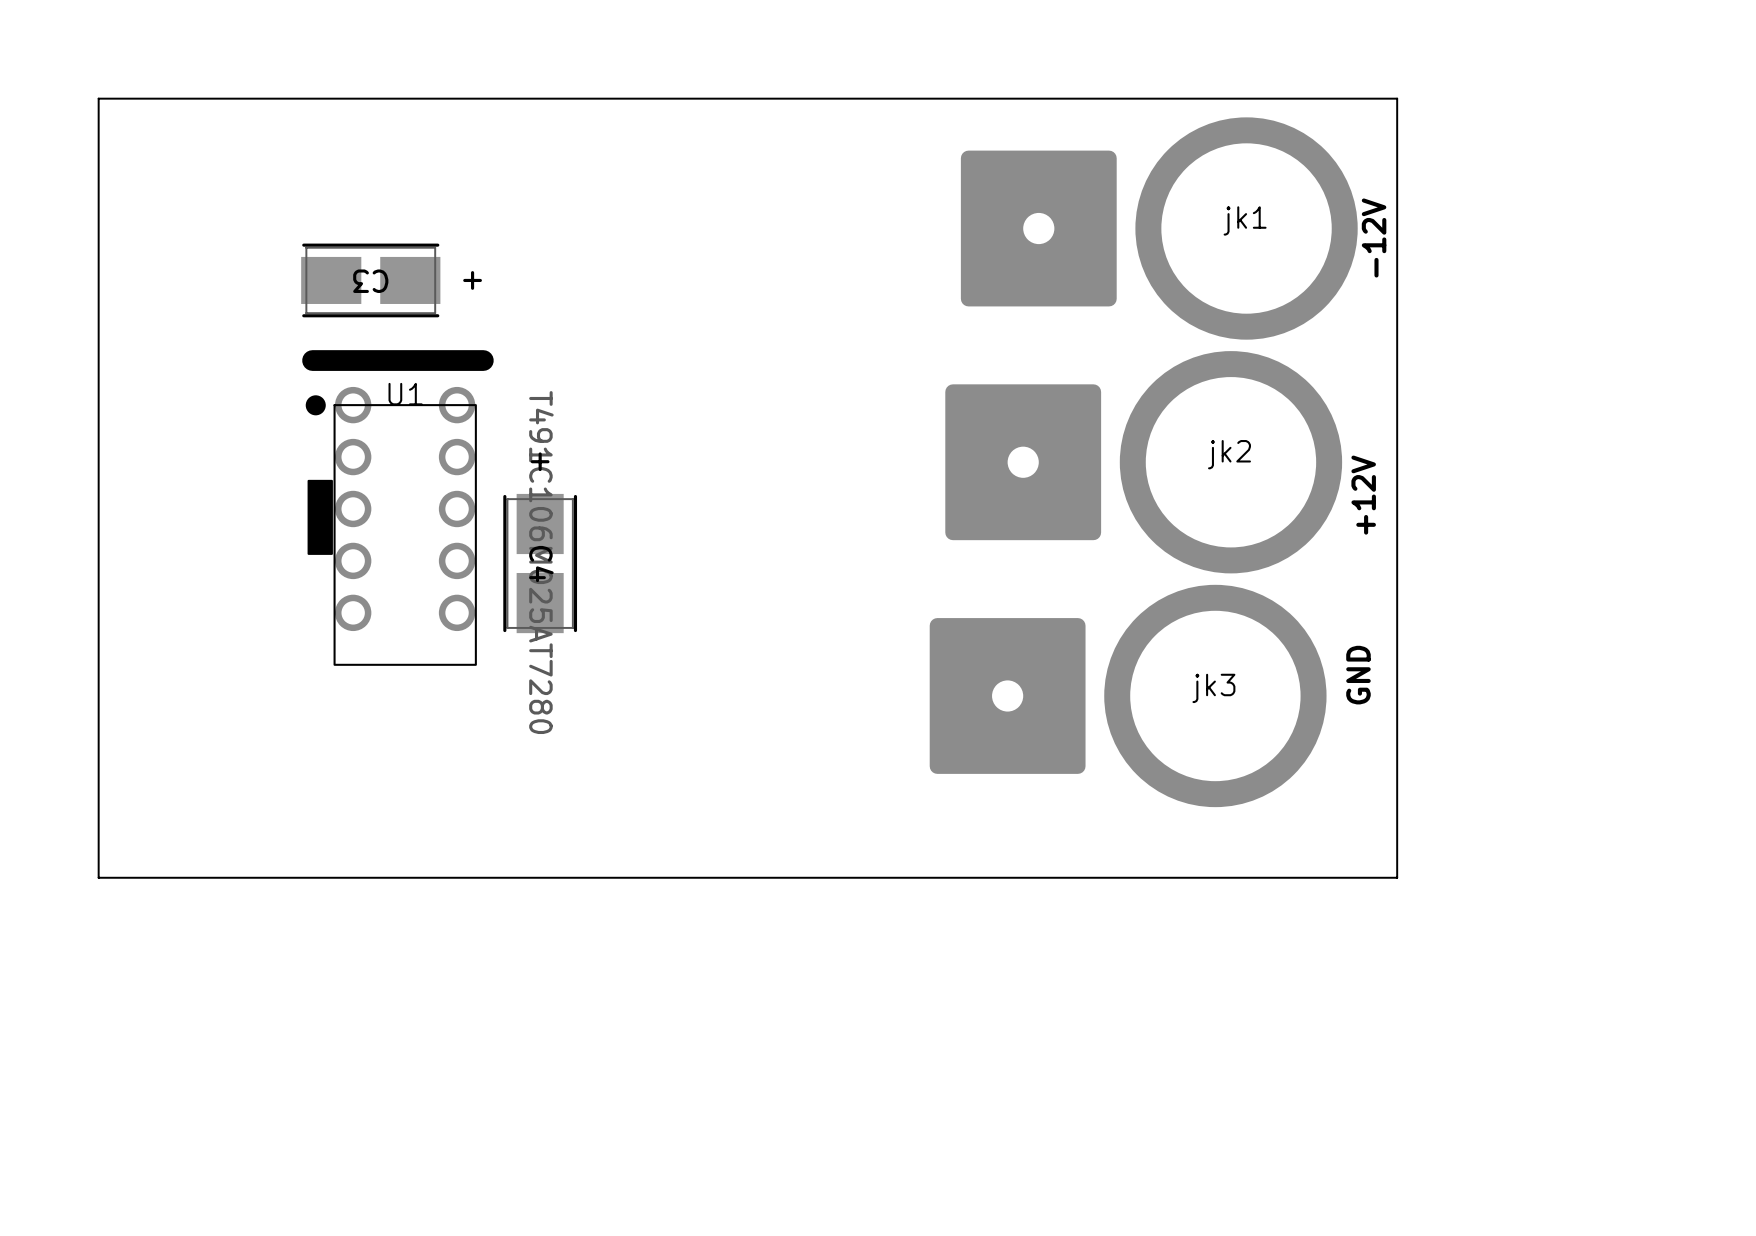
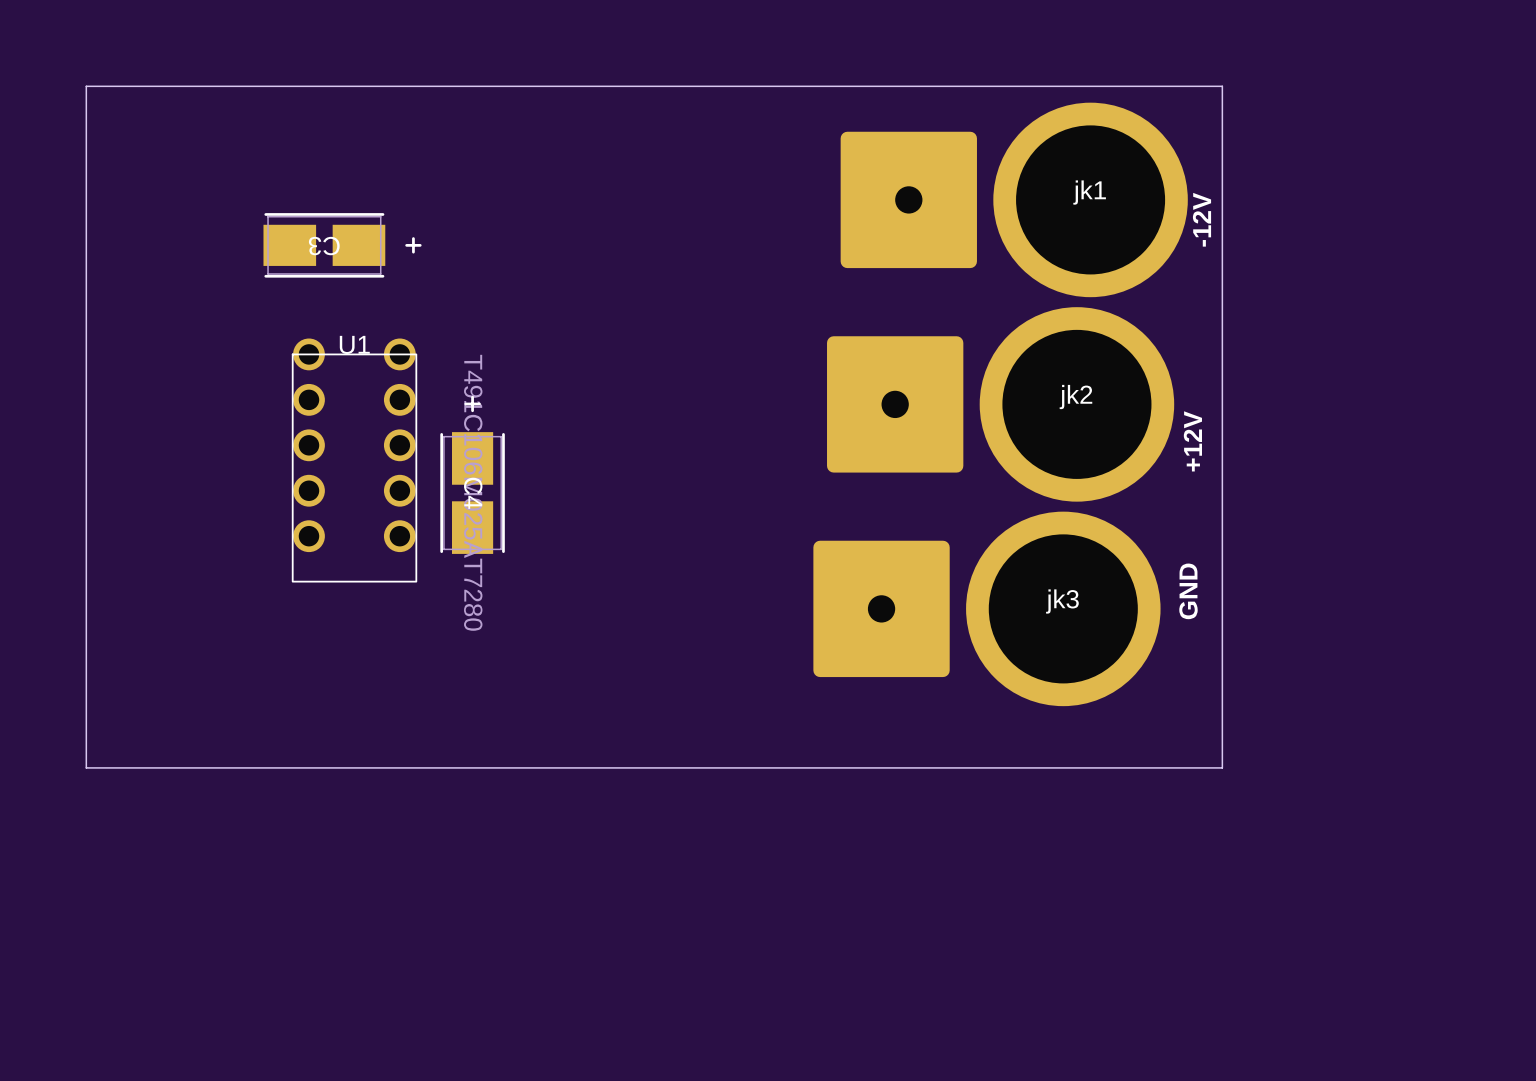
U1 footprint: [302, 350, 494, 666] -> [291, 338, 418, 583]

